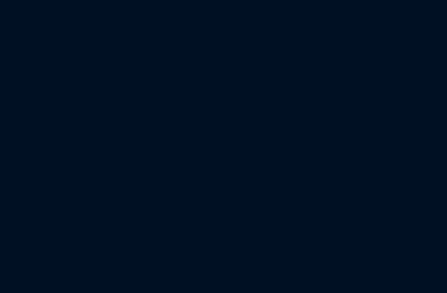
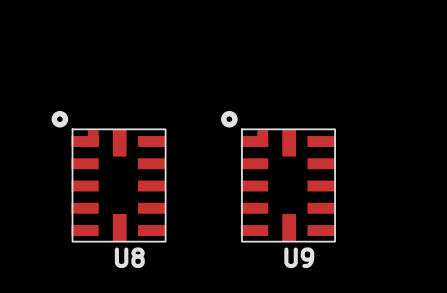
U8: none -> (108, 176)
U9: none -> (278, 176)

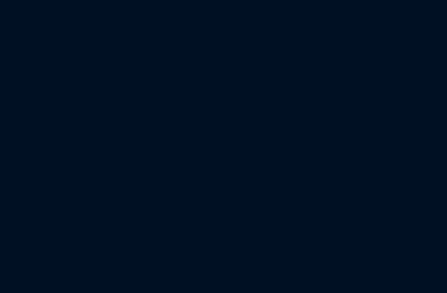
U8: (108, 176) -> none
U9: (278, 176) -> none

